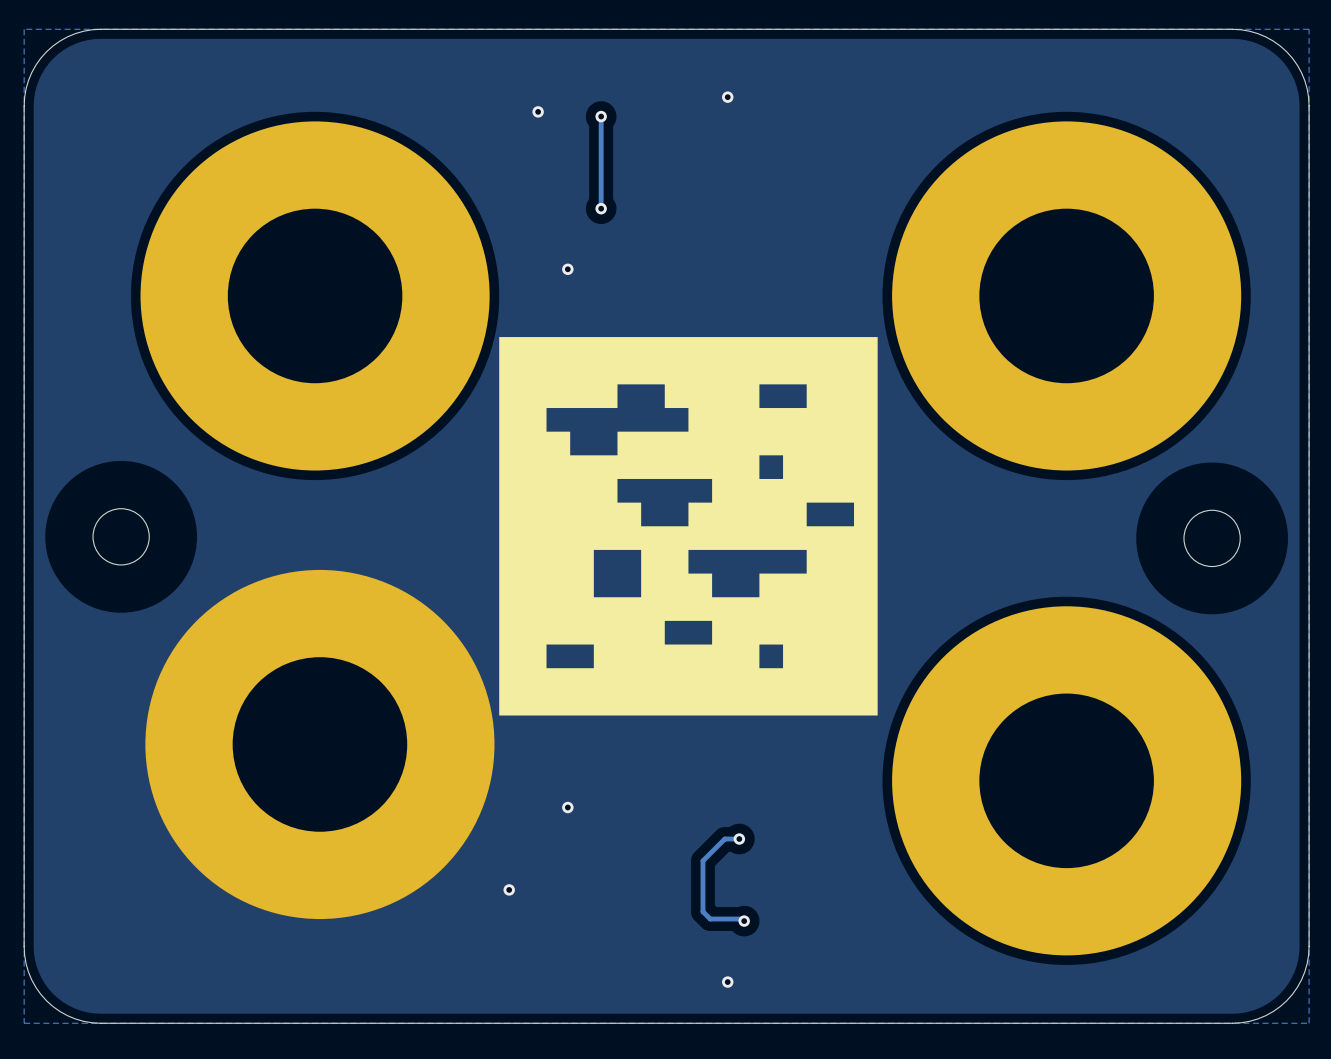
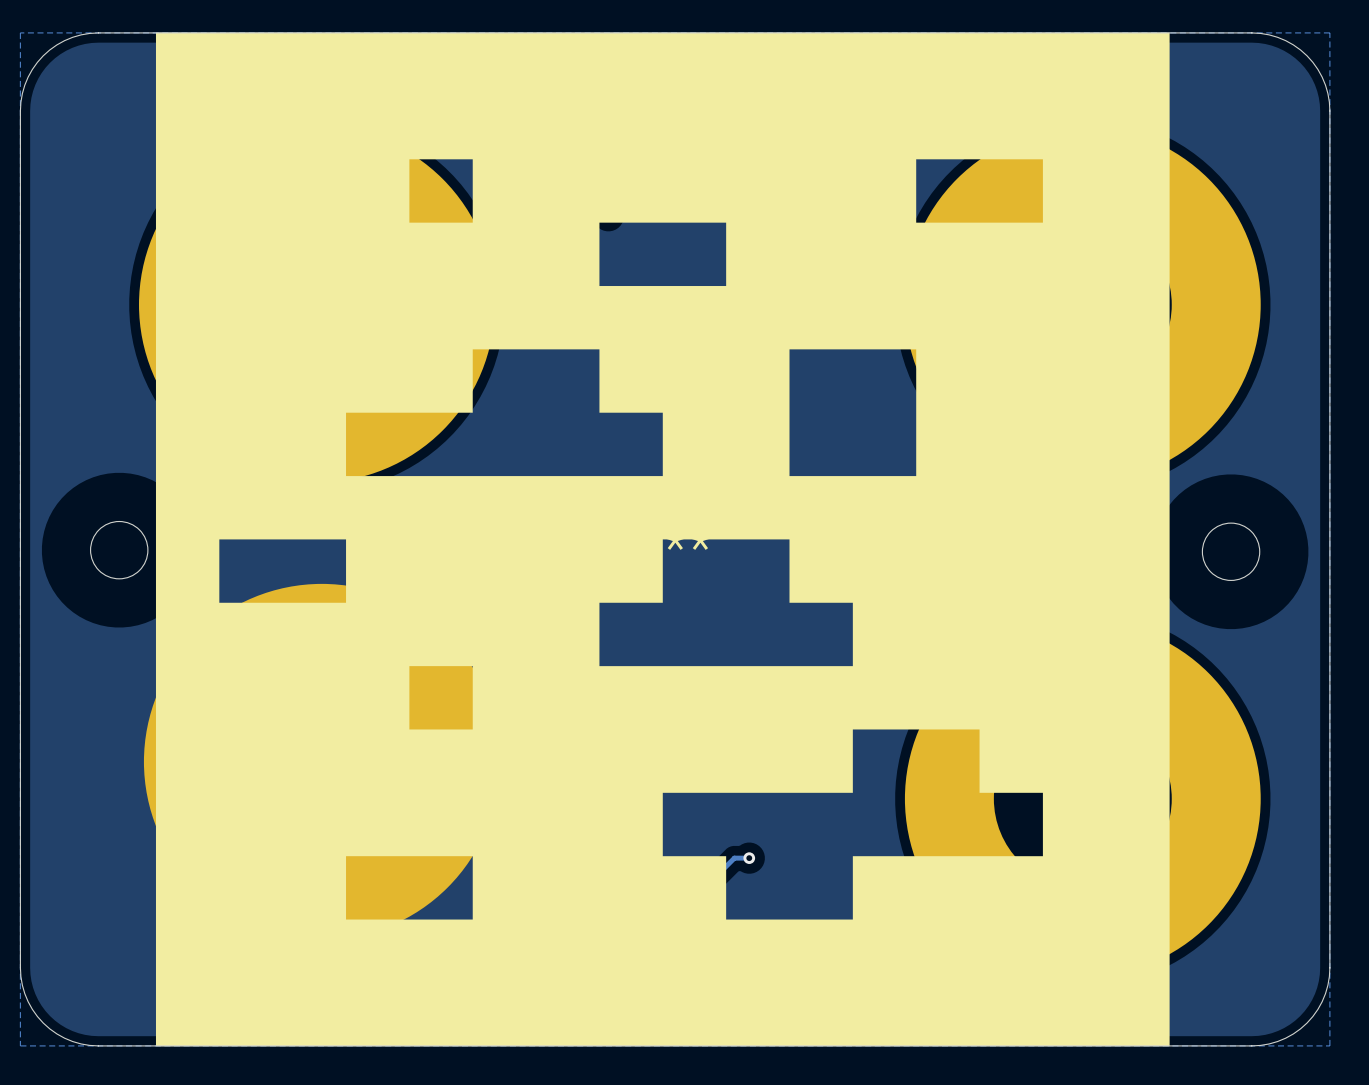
drawing: [499, 337, 878, 716] -> none
part: none -> (662, 539)

